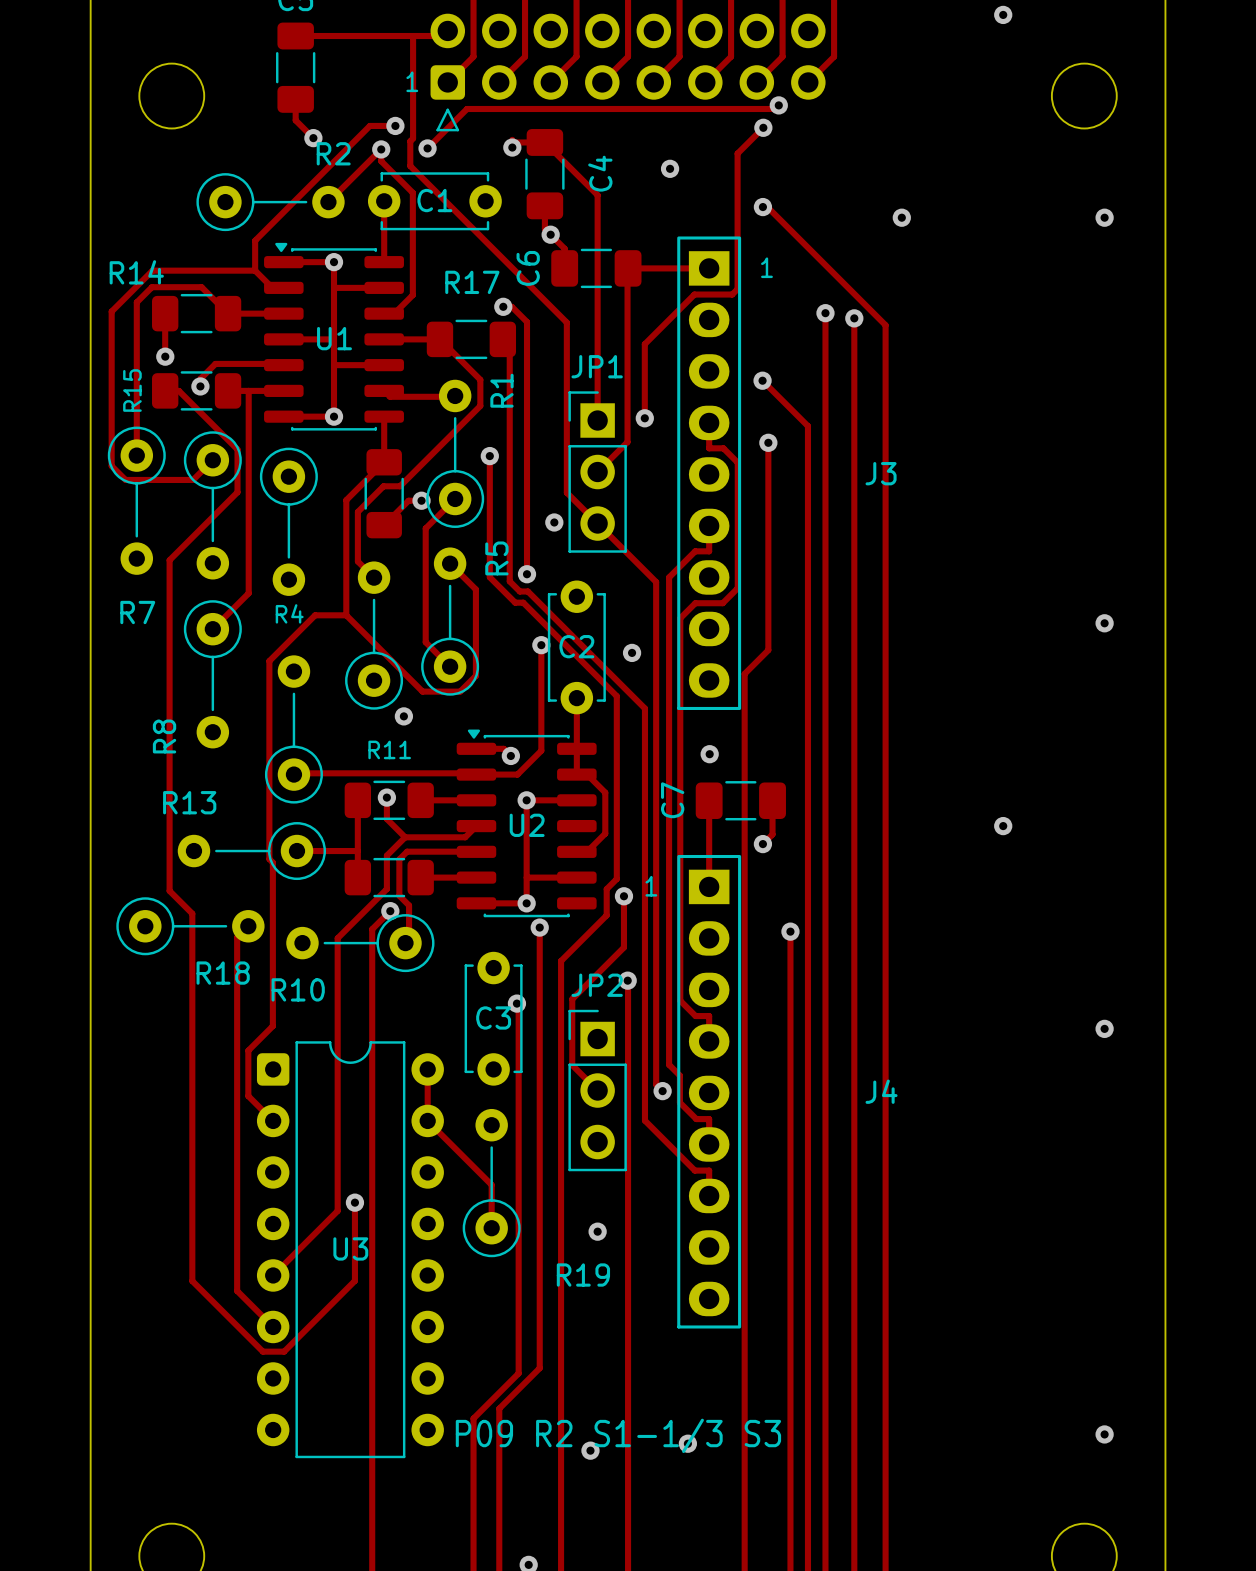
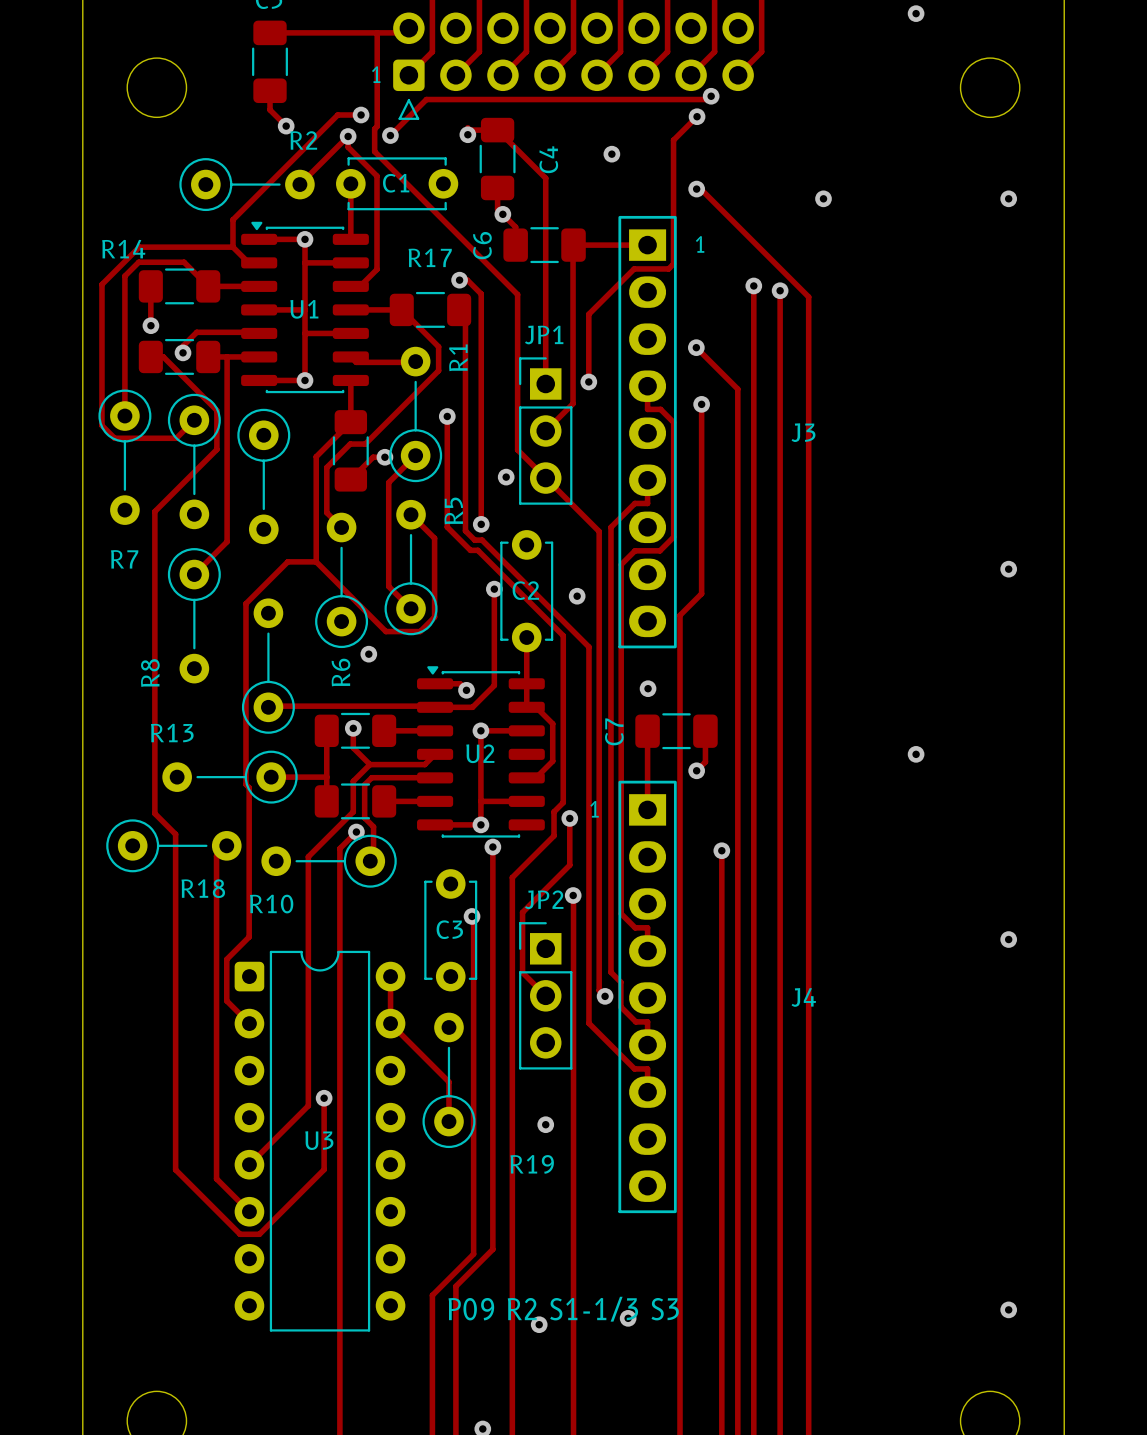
R15 name: R15 (132, 390) -> none
R4 name: R4 (289, 613) -> none
R6 name: none -> R6 (341, 672)
R11 name: R11 (389, 749) -> none

